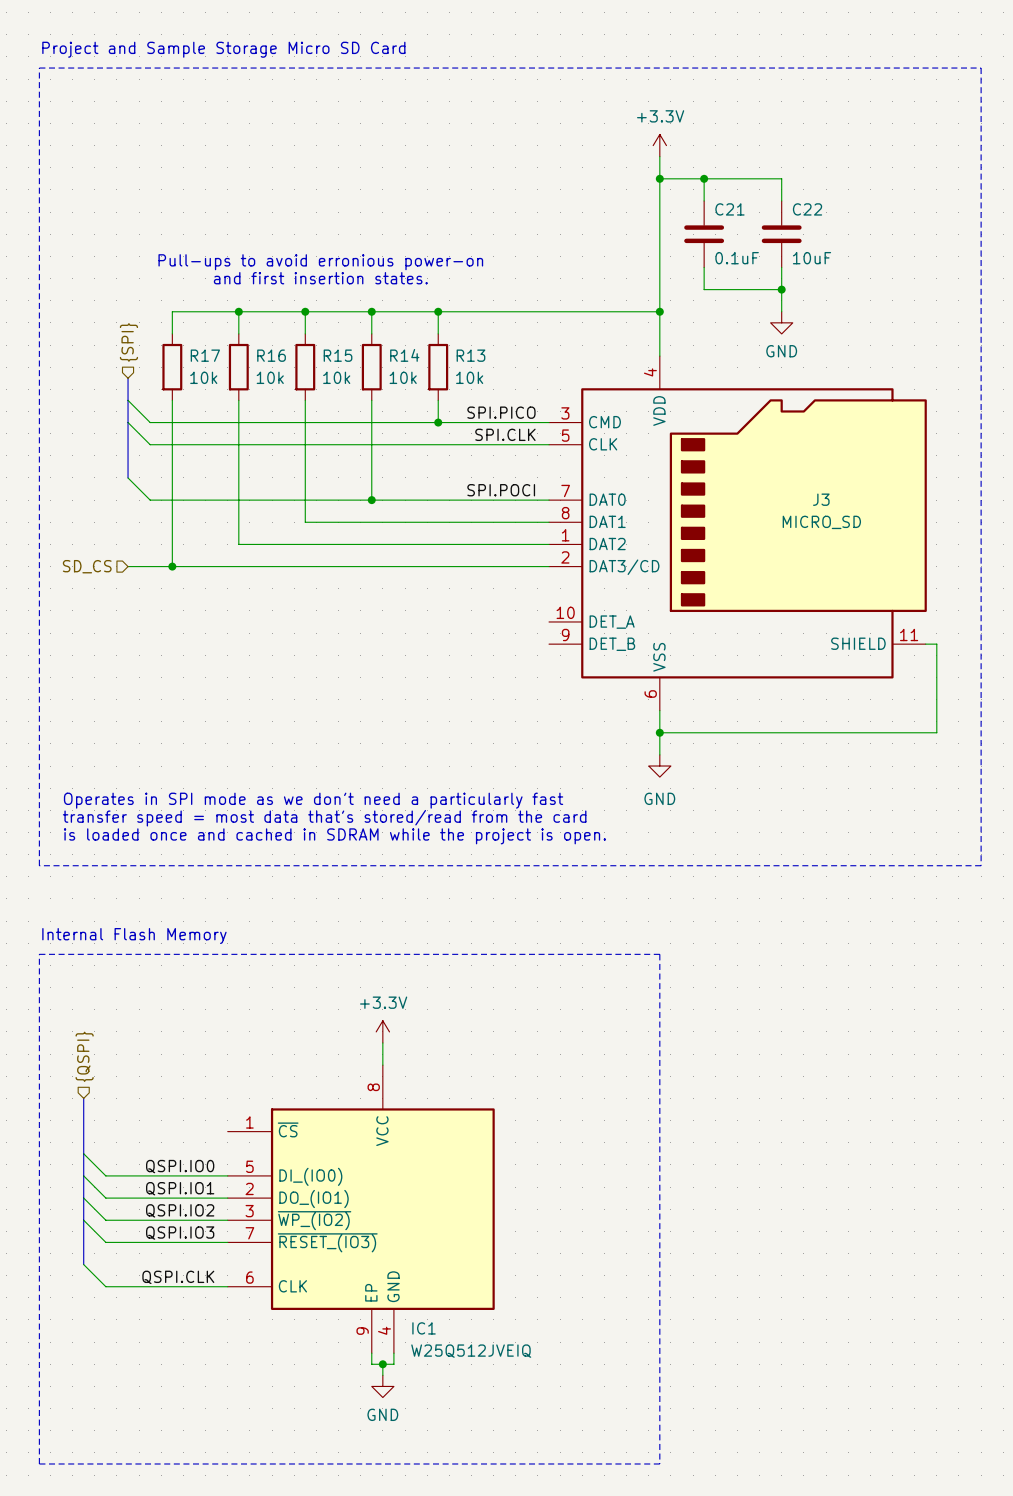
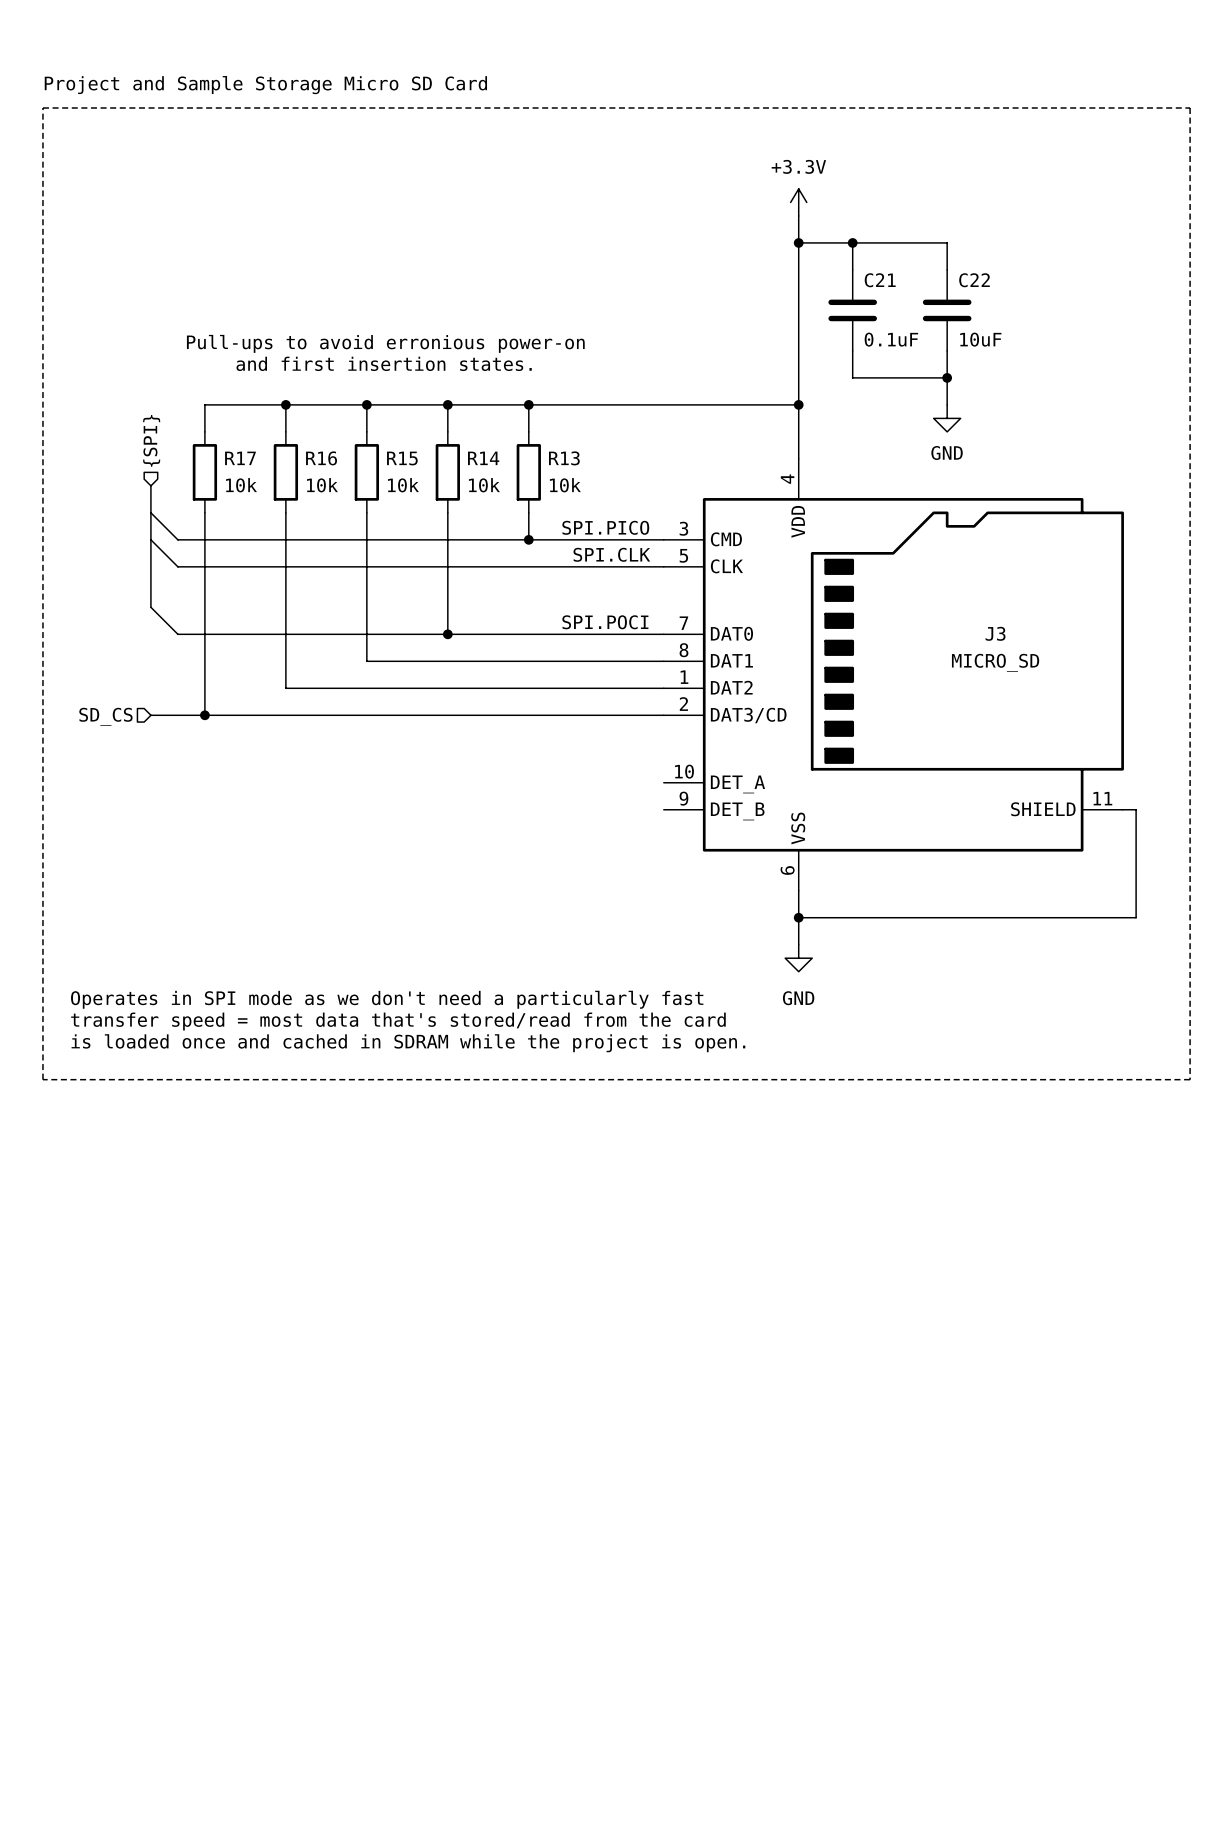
text: Internal Flash Memory (134, 936) -> none
line: (39, 954) (659, 954) (659, 1463) (39, 1463) (39, 954) -> none
power symbol: +3.3V (382, 1031) -> none
wire: (382, 1042) (382, 1065) -> none
hierarchical label: {QSPI} (84, 1056) -> none
bus: (83, 1098) (83, 1264) -> none
wire: (83, 1153) (105, 1175) (227, 1175) -> none
label: QSPI.IO0 (180, 1166) -> none
wire: (83, 1175) (105, 1198) (227, 1198) -> none
label: QSPI.IO1 (180, 1188) -> none
wire: (83, 1198) (105, 1220) (227, 1220) -> none
IC1: W25Q512JVEIQ (361, 1209) -> none
label: QSPI.IO2 (180, 1210) -> none
wire: (83, 1220) (105, 1242) (227, 1242) -> none
label: QSPI.IO3 (180, 1233) -> none
wire: (83, 1264) (105, 1286) (227, 1286) -> none
label: QSPI.CLK (178, 1277) -> none
wire: (371, 1353) (371, 1364) (393, 1364) (393, 1353) -> none
wire: (382, 1364) (382, 1375) -> none
junction: (382, 1364) -> none
power symbol: GND (382, 1386) -> none

